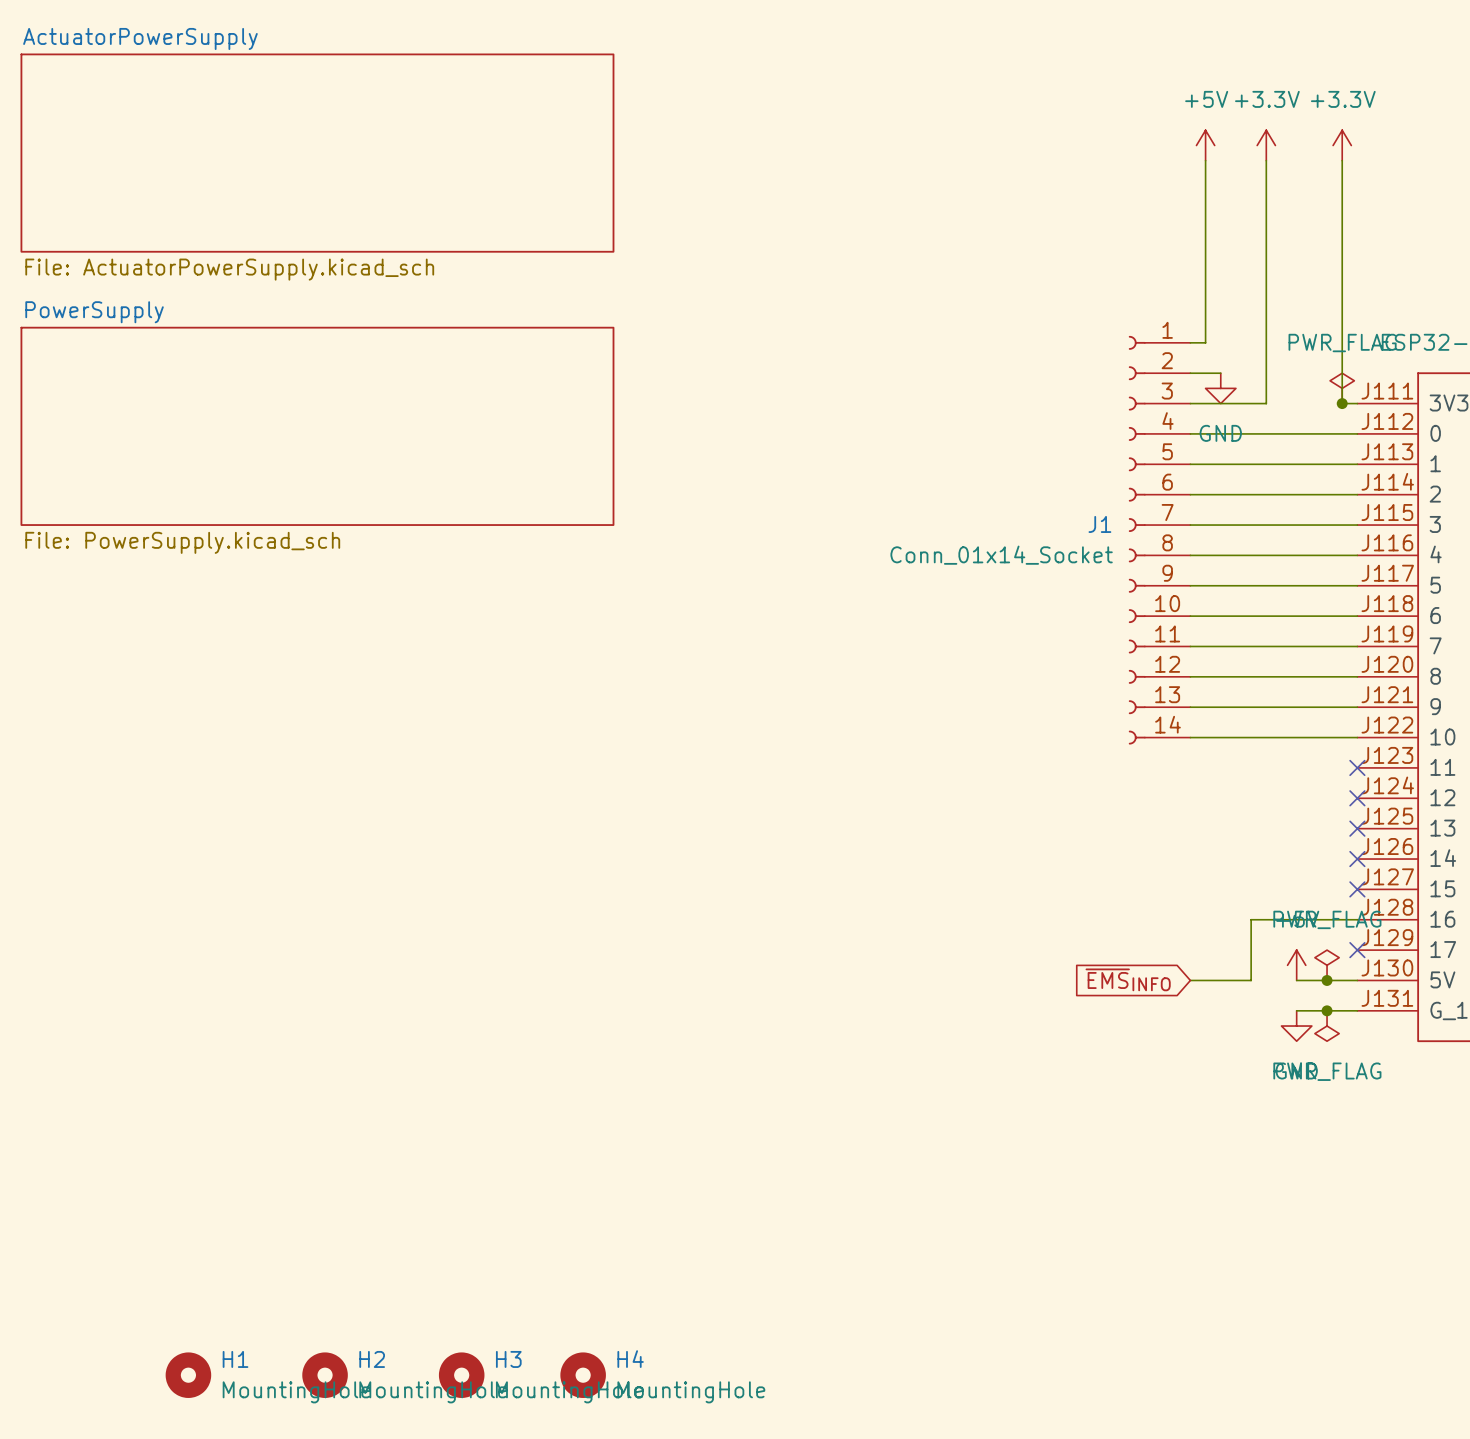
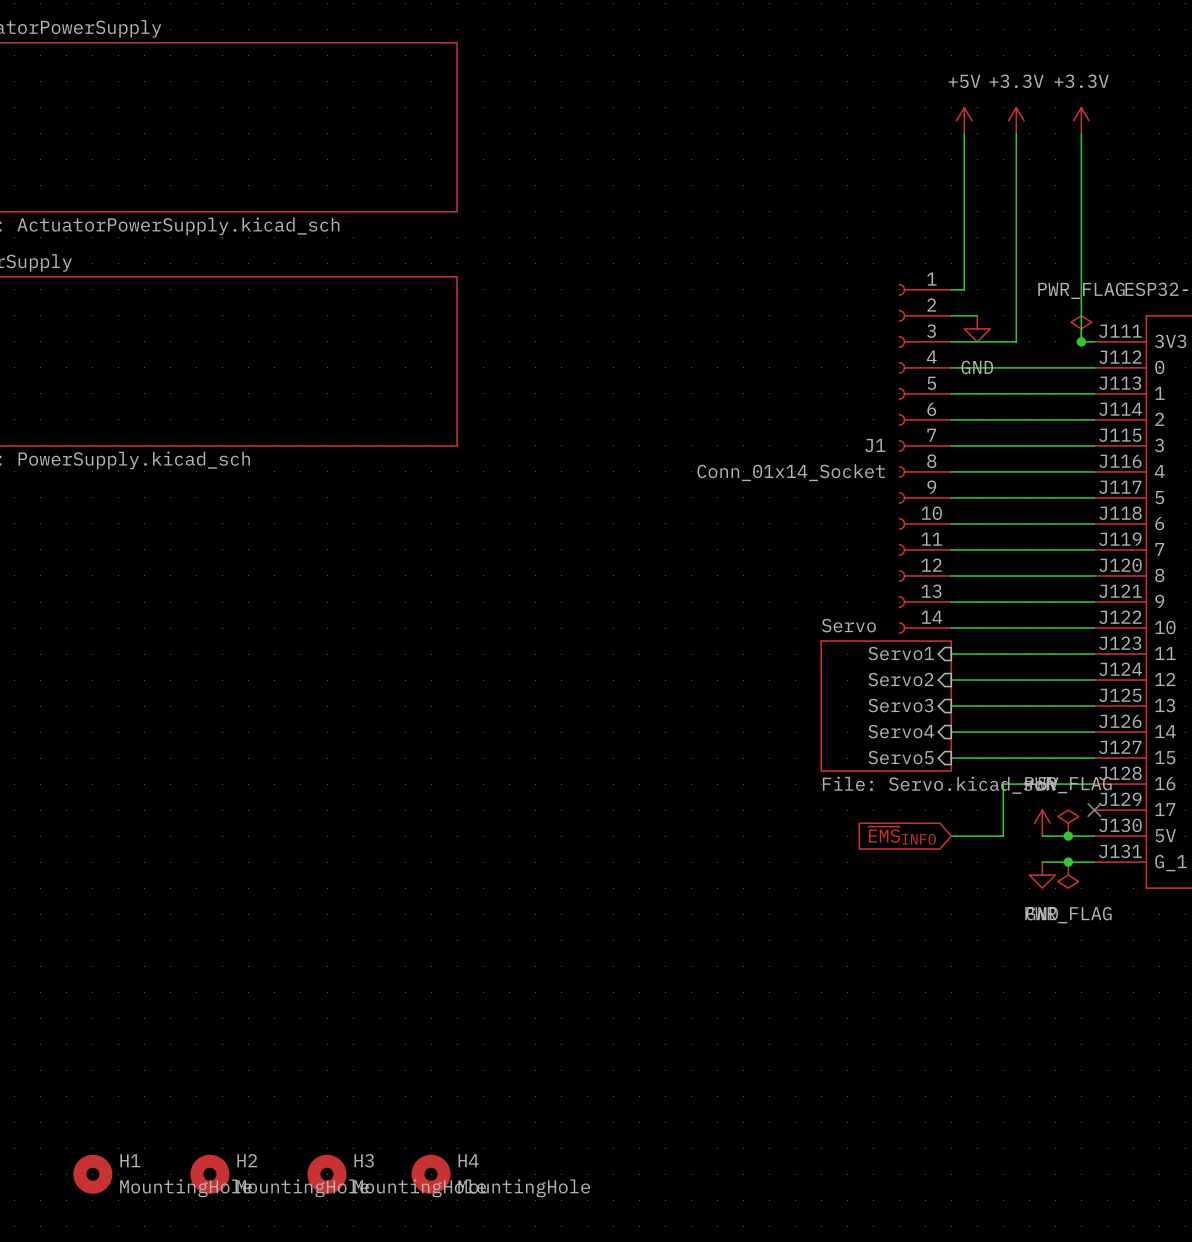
sheet pin: none -> Servo1 (901, 653)
wire: none -> (951, 654) (1094, 654)
no-connect mark: (1357, 767) -> none
sheet pin: none -> Servo2 (901, 679)
wire: none -> (951, 680) (1094, 680)
no-connect mark: (1357, 798) -> none
sheet Servo: none -> File: Servo.kicad_sch (886, 706)
sheet pin: none -> Servo3 (900, 705)
wire: none -> (951, 706) (1094, 706)
no-connect mark: (1357, 828) -> none
sheet pin: none -> Servo4 (901, 731)
wire: none -> (951, 732) (1094, 732)
no-connect mark: (1357, 859) -> none
sheet pin: none -> Servo5 (901, 757)
wire: none -> (951, 758) (1094, 758)
no-connect mark: (1357, 889) -> none

